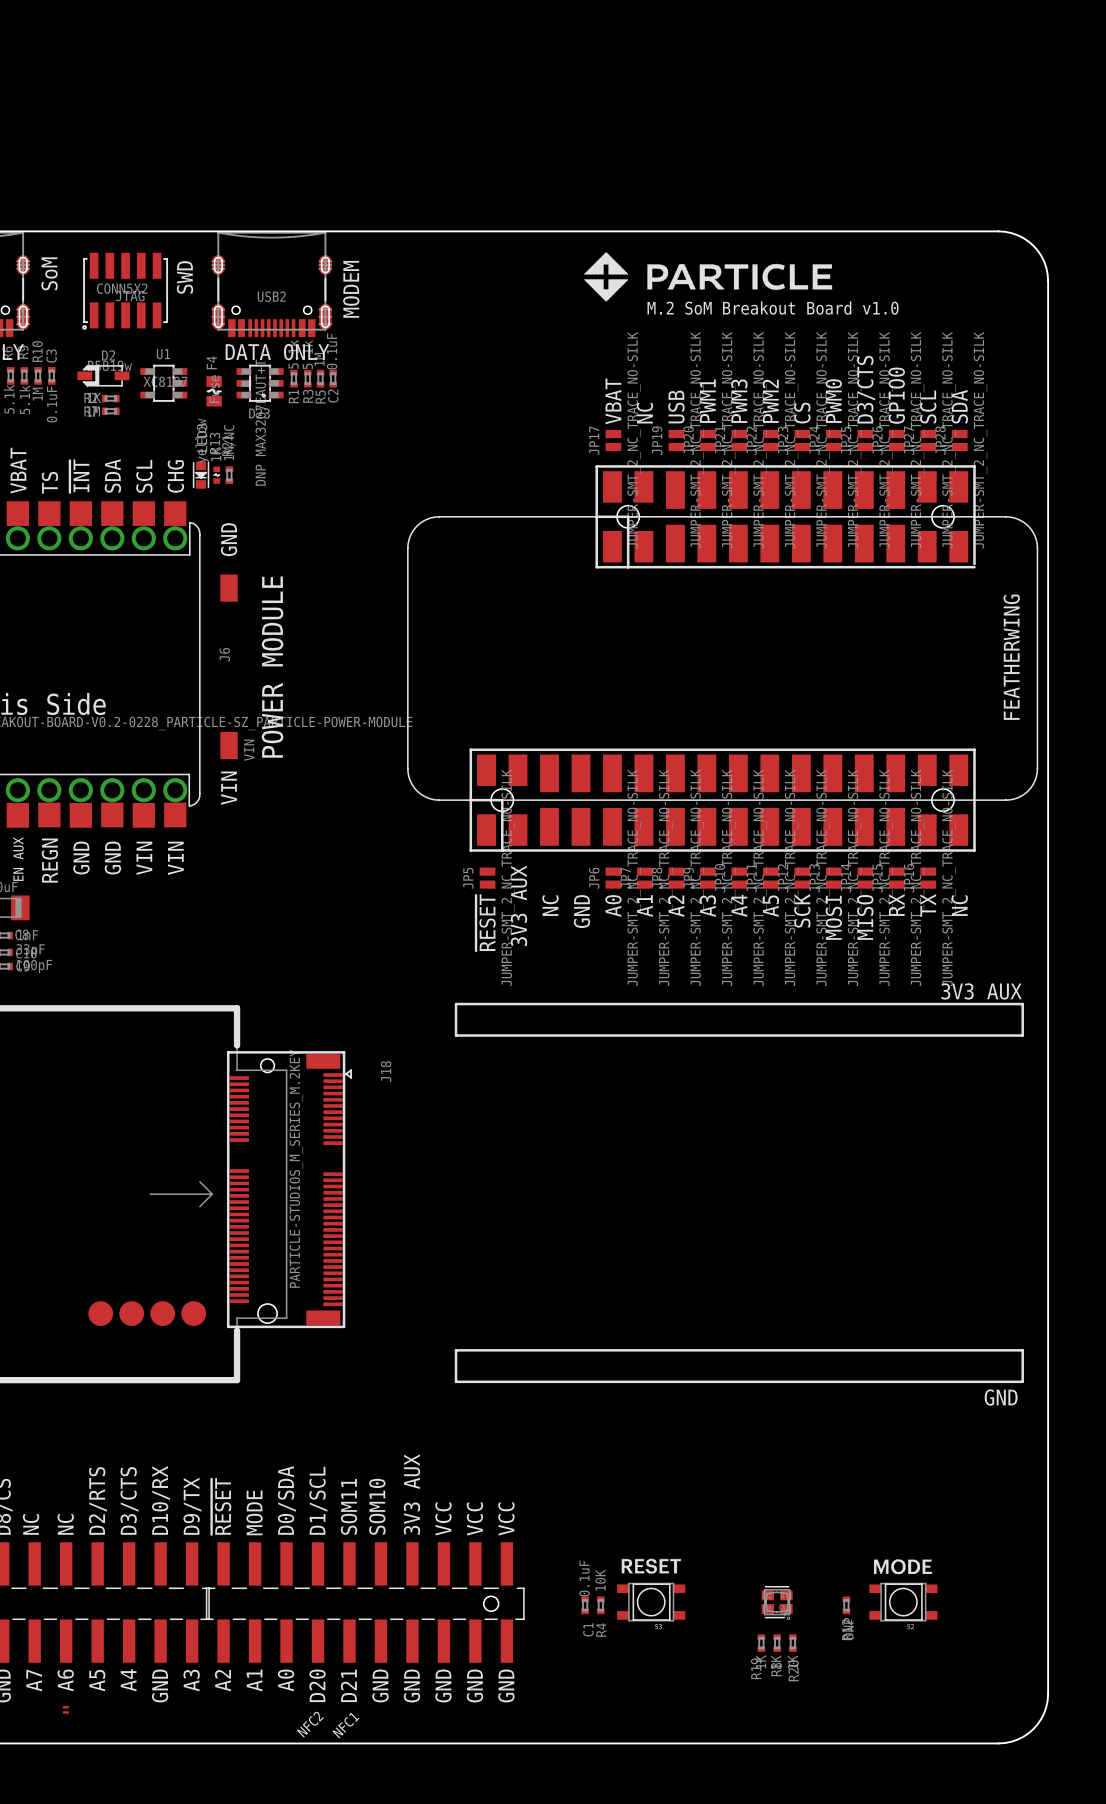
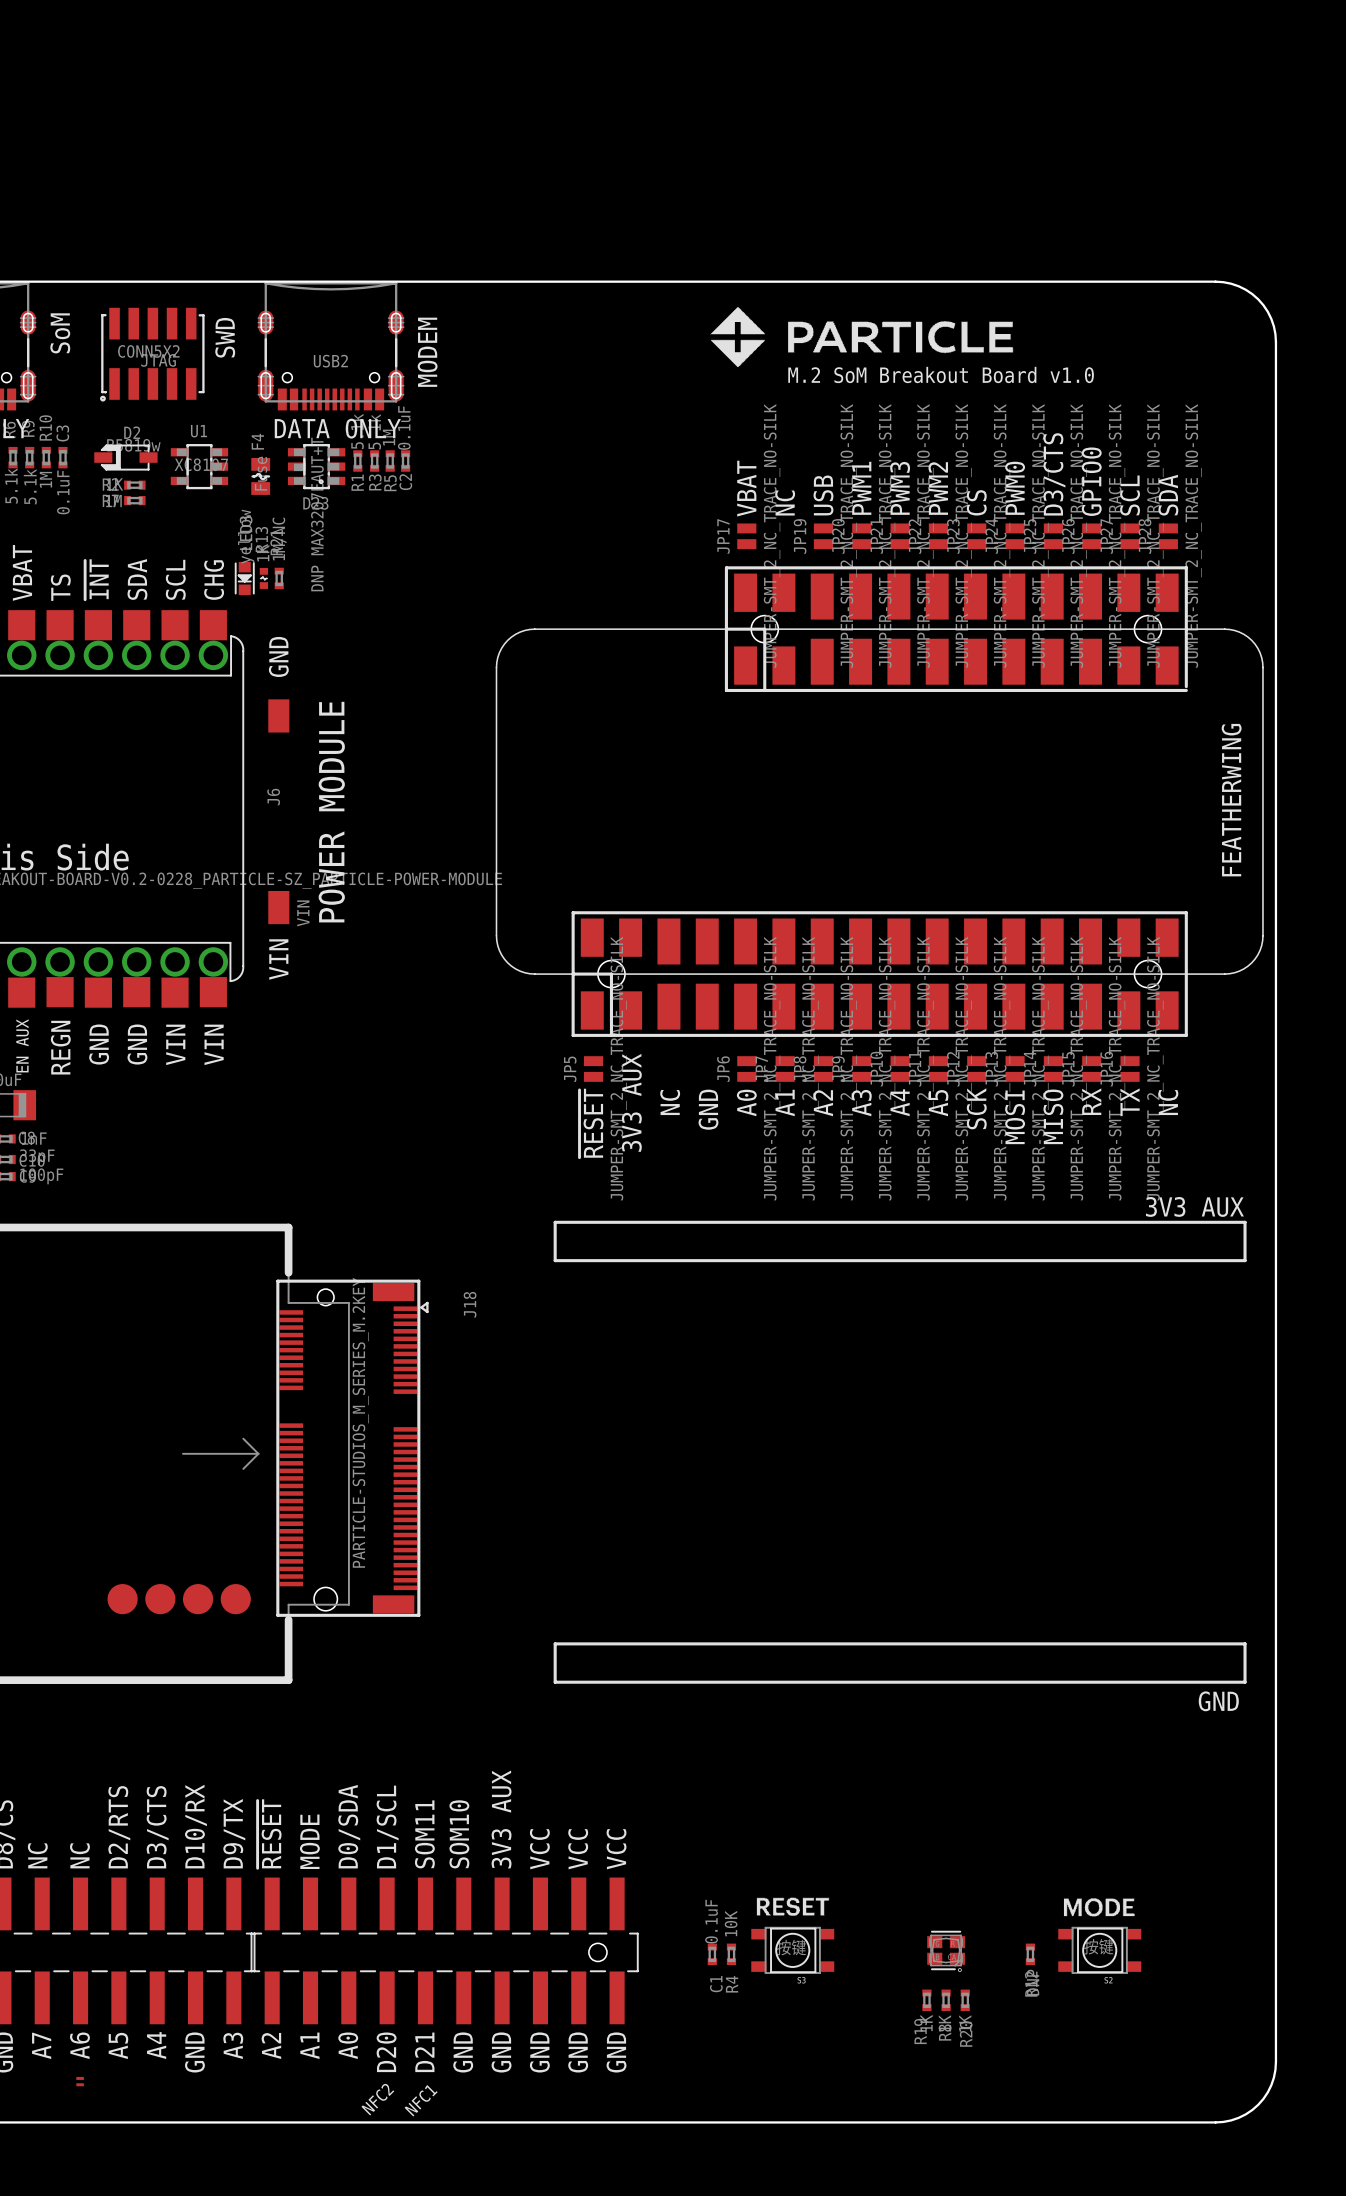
text: none -> 按键 (791, 1947)
text: none -> 按键 (1098, 1946)

